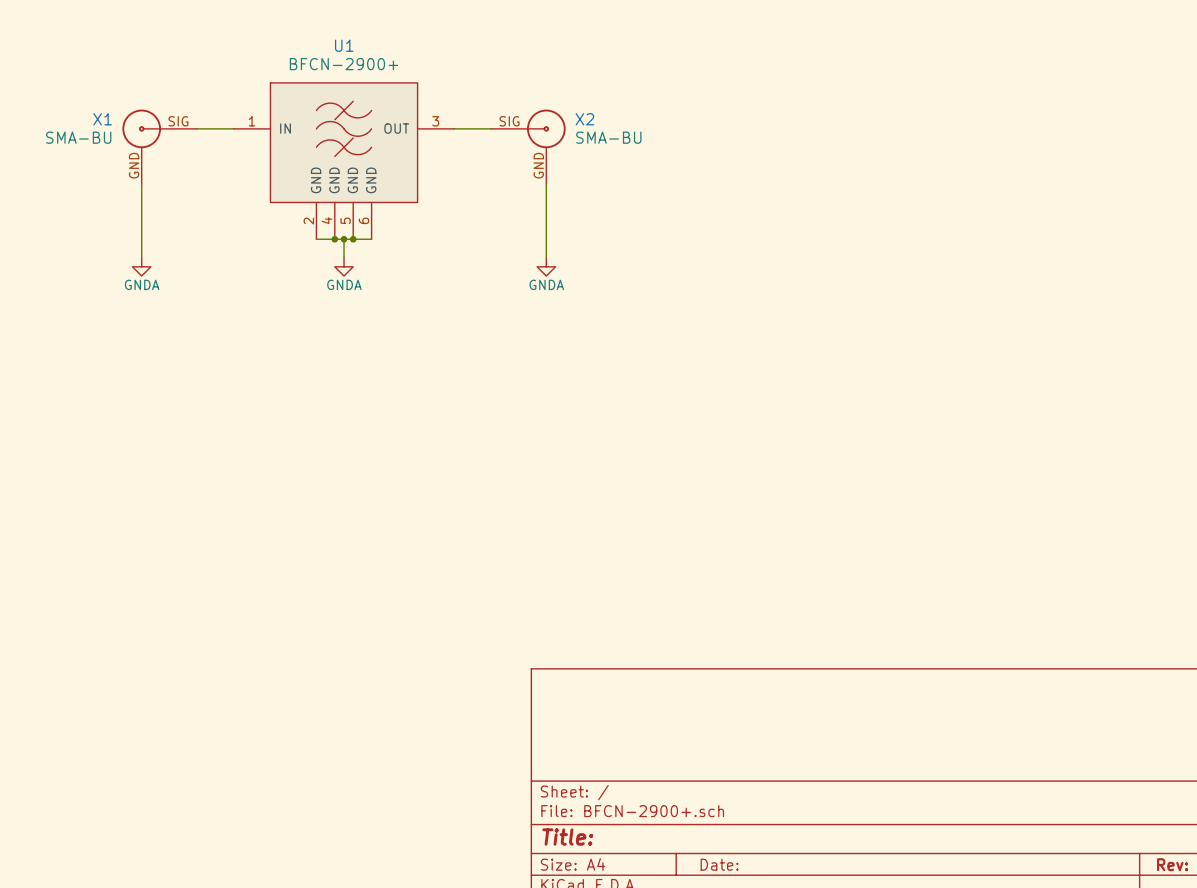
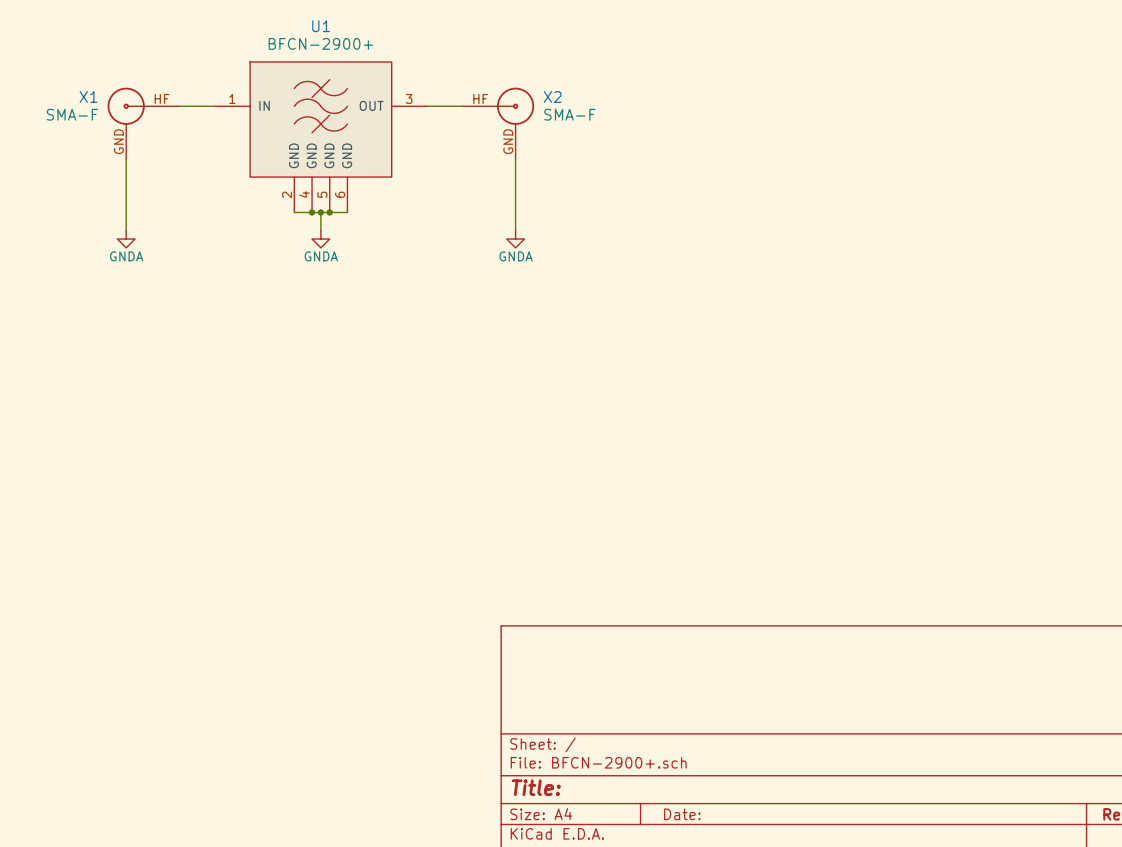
X1 pin number: SIG (178, 121) -> HF (162, 98)
X2 pin number: SIG (509, 121) -> HF (480, 98)
X1 value: SMA-BU (78, 137) -> SMA-F (72, 114)
X2 value: SMA-BU (608, 137) -> SMA-F (569, 114)

